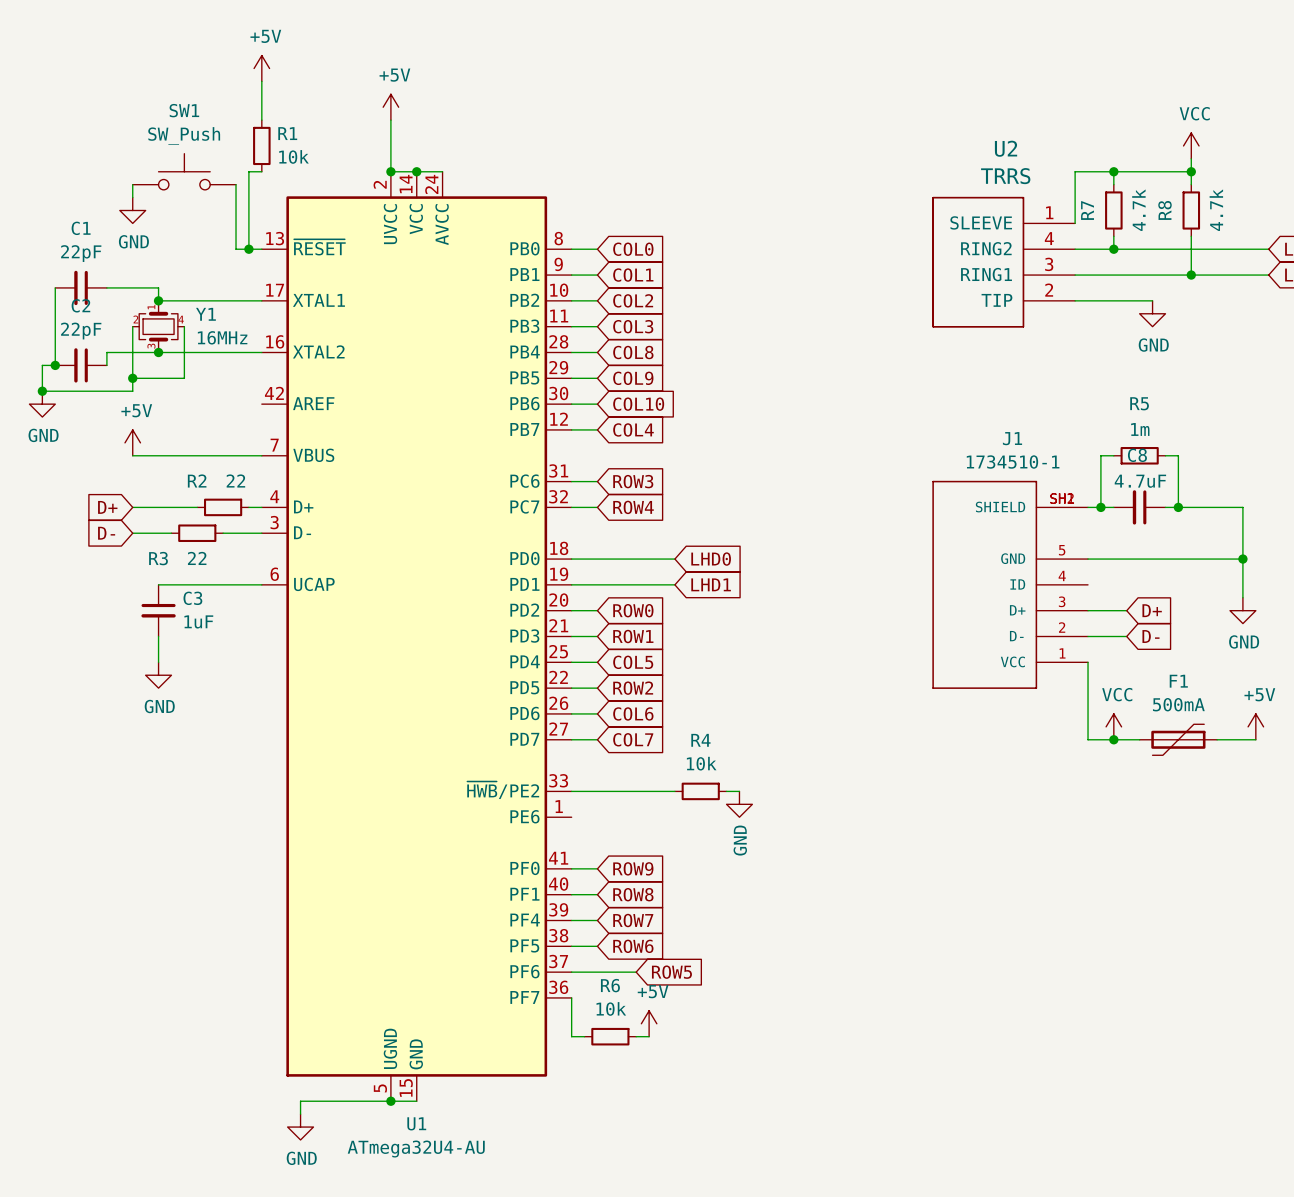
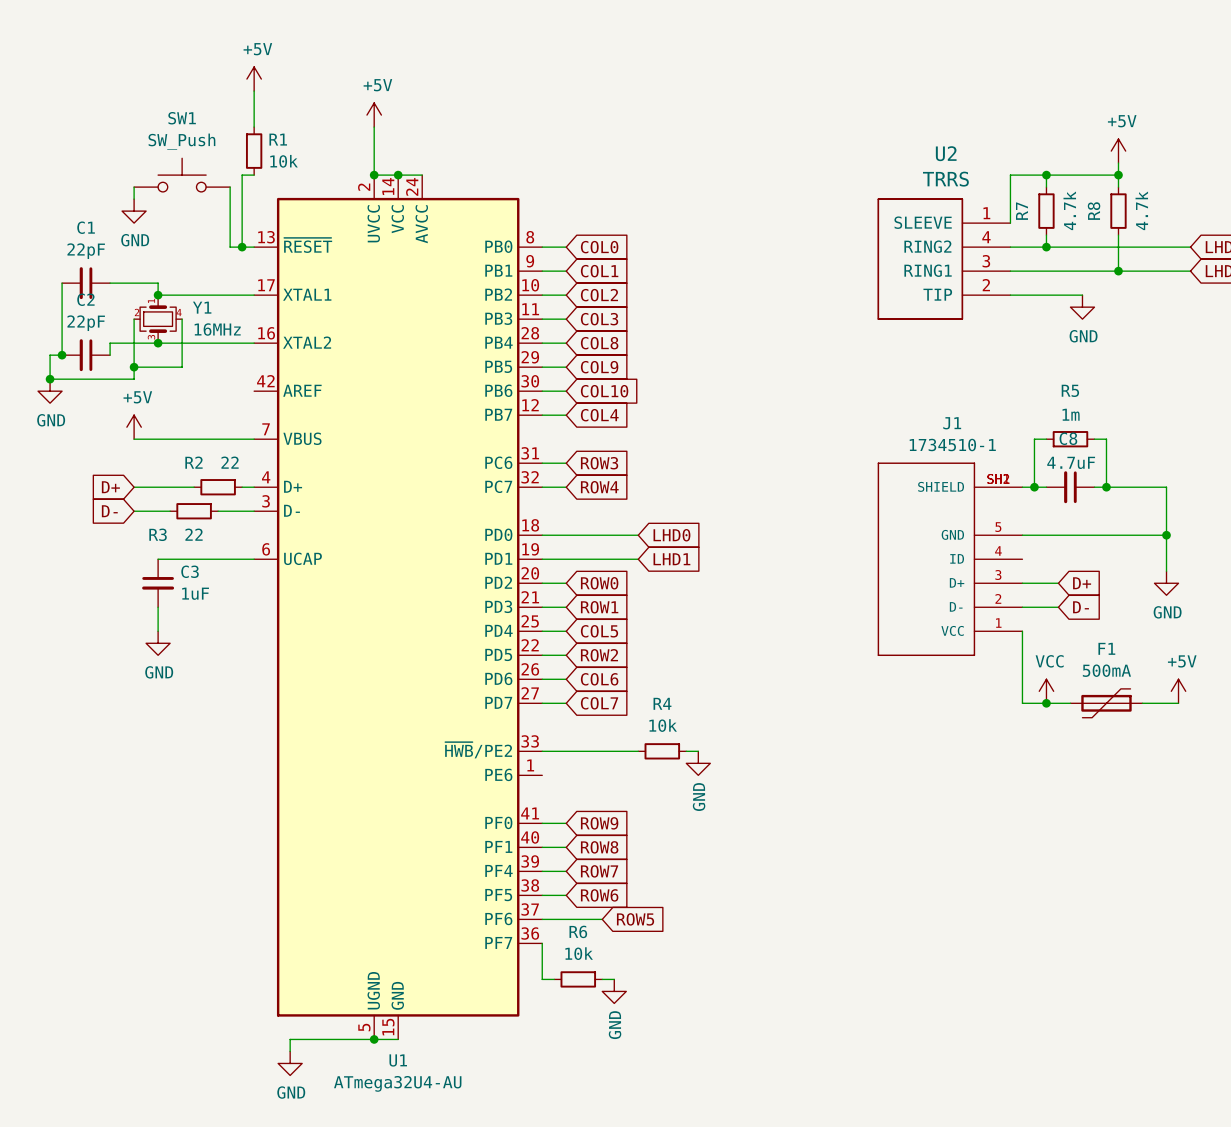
power symbol: VCC (1191, 145) -> +5V (1118, 151)
power symbol: +5V (649, 1023) -> none
power symbol: none -> GND (614, 991)

